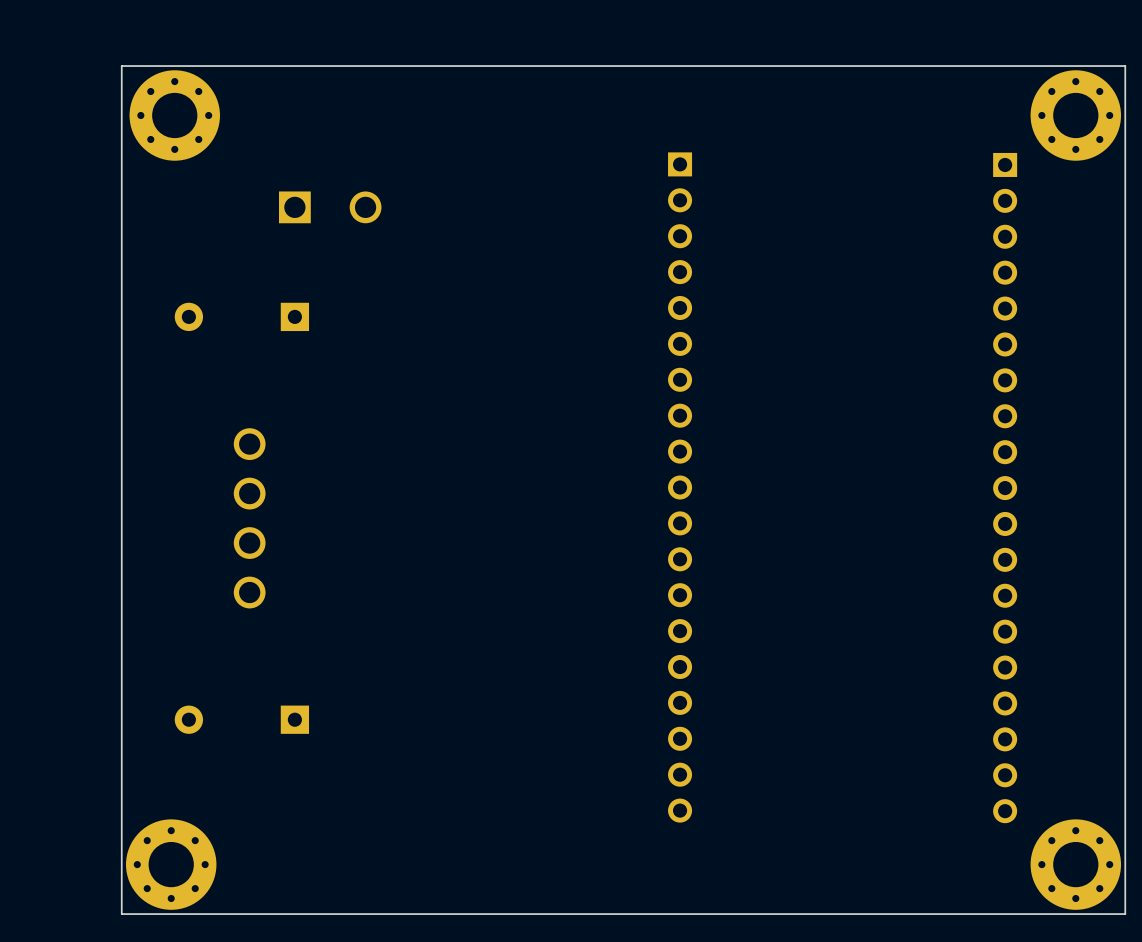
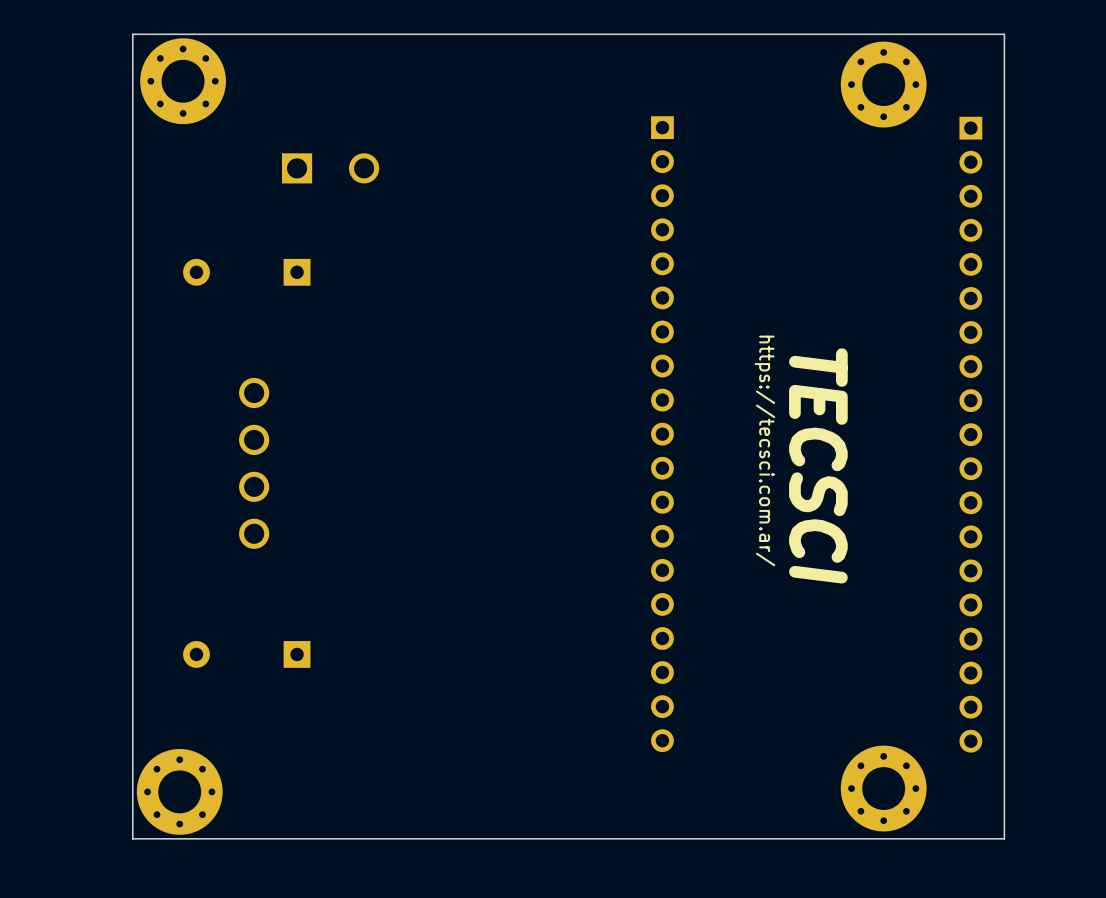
board edge: (1040, 66) (1125, 66) (1125, 914) (1040, 914) -> (1004, 34) (1004, 838)
part position: (1075, 115) -> (883, 84)
text: none -> https://tecsci.com.ar/ (764, 450)
text: none -> TECSCI (818, 465)
part position: (1075, 864) -> (883, 788)

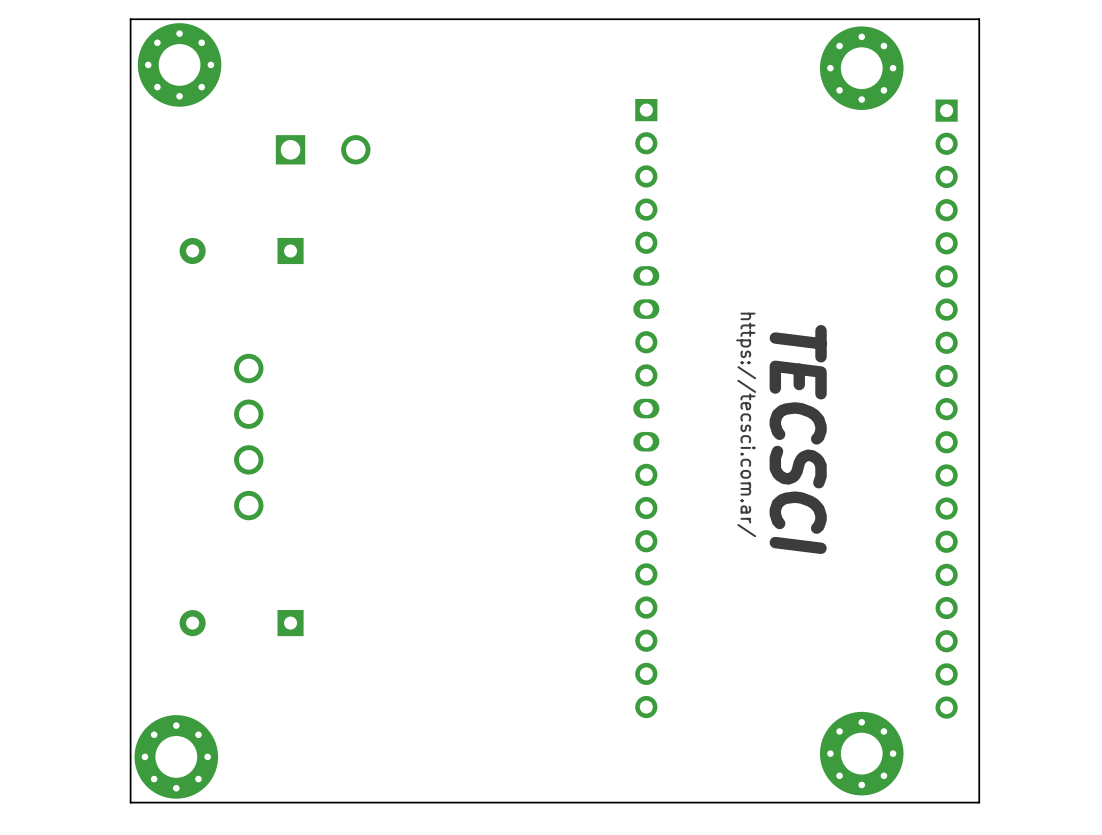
part footprint: [651, 116, 674, 753] -> [633, 99, 660, 719]

